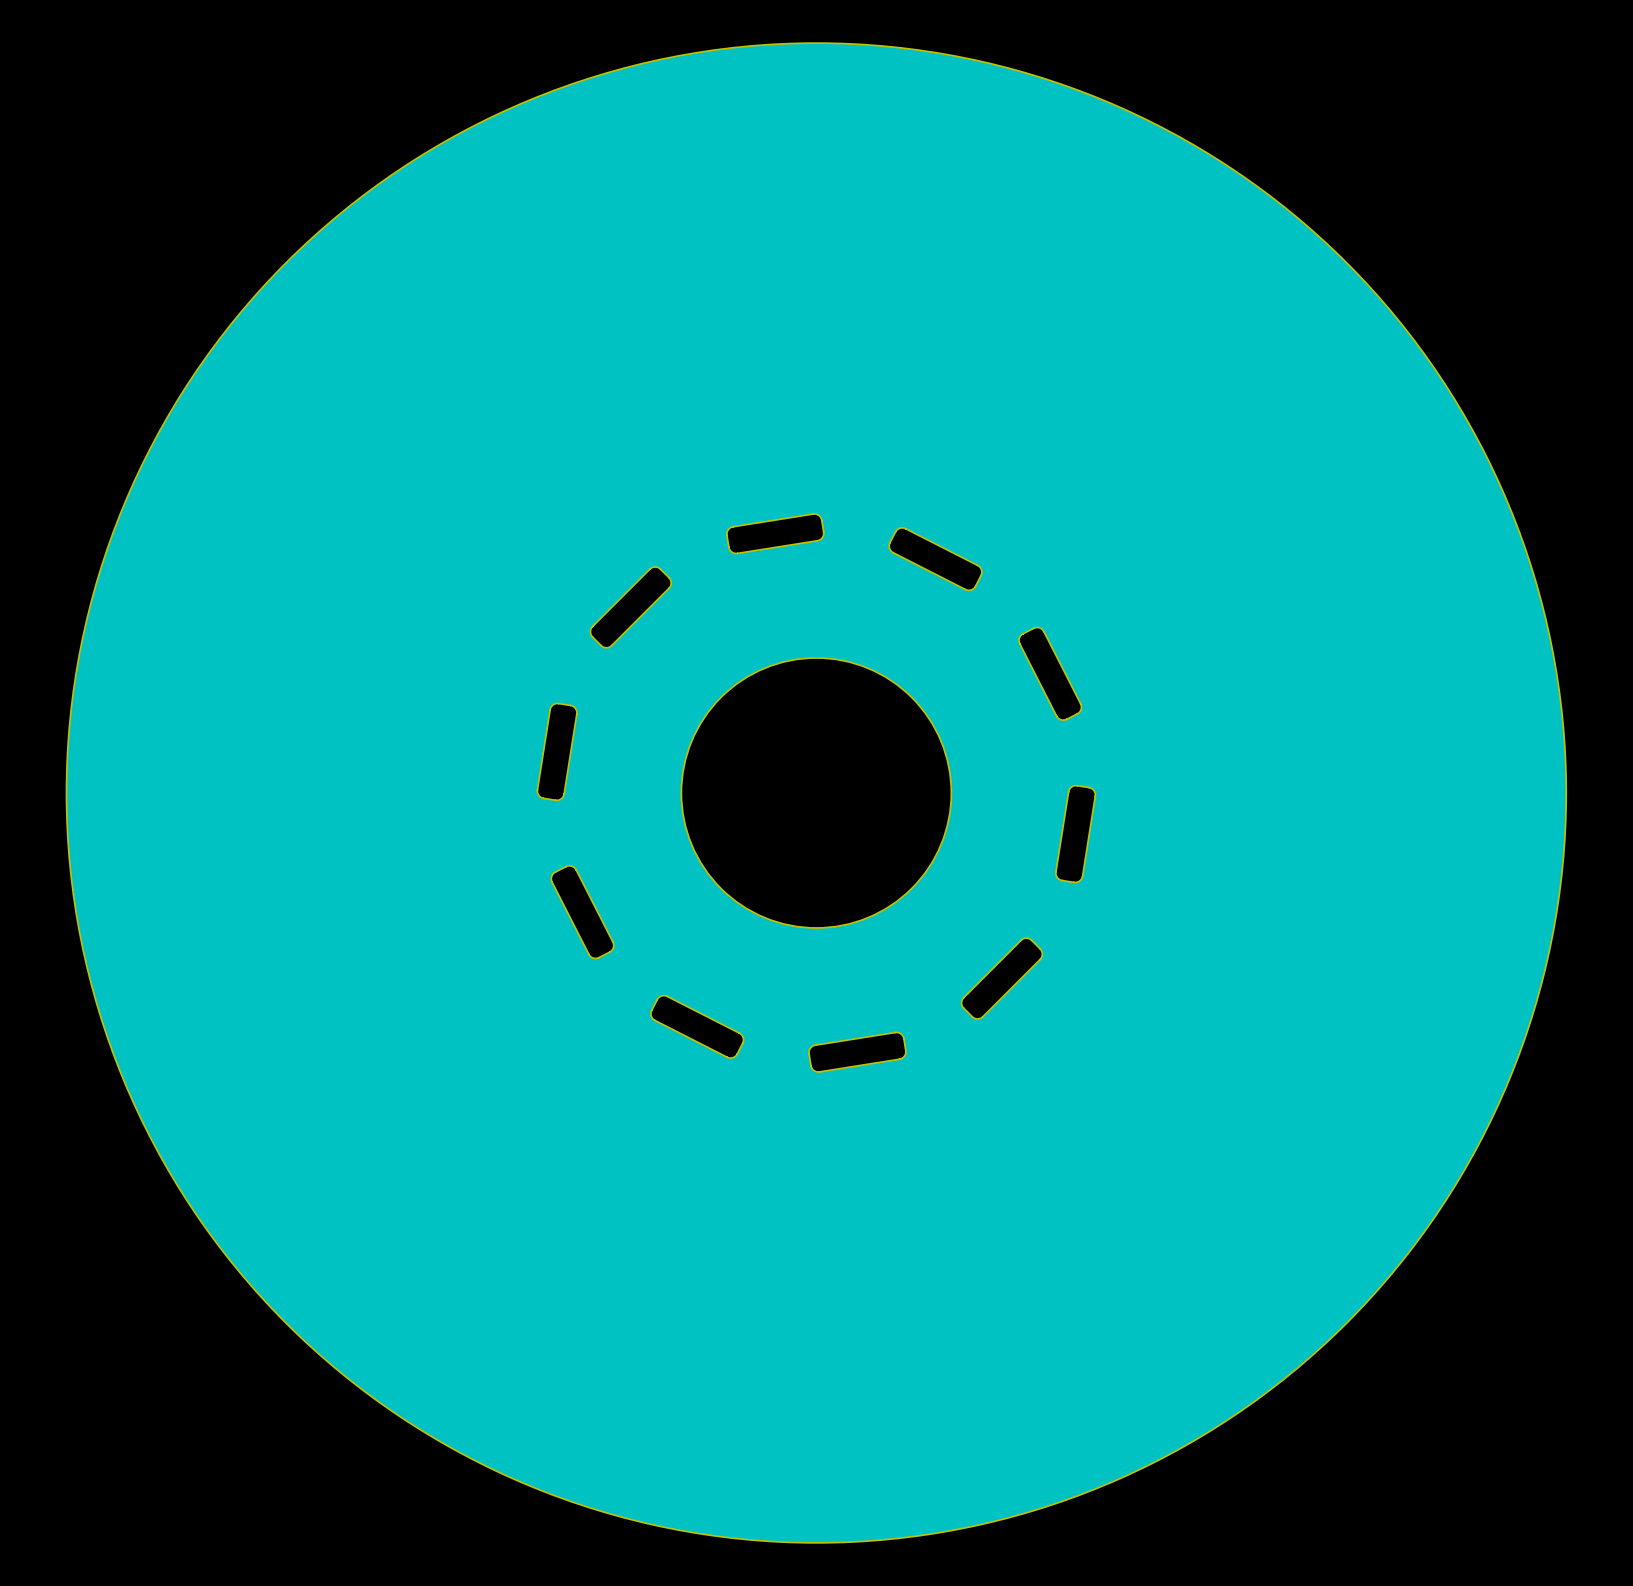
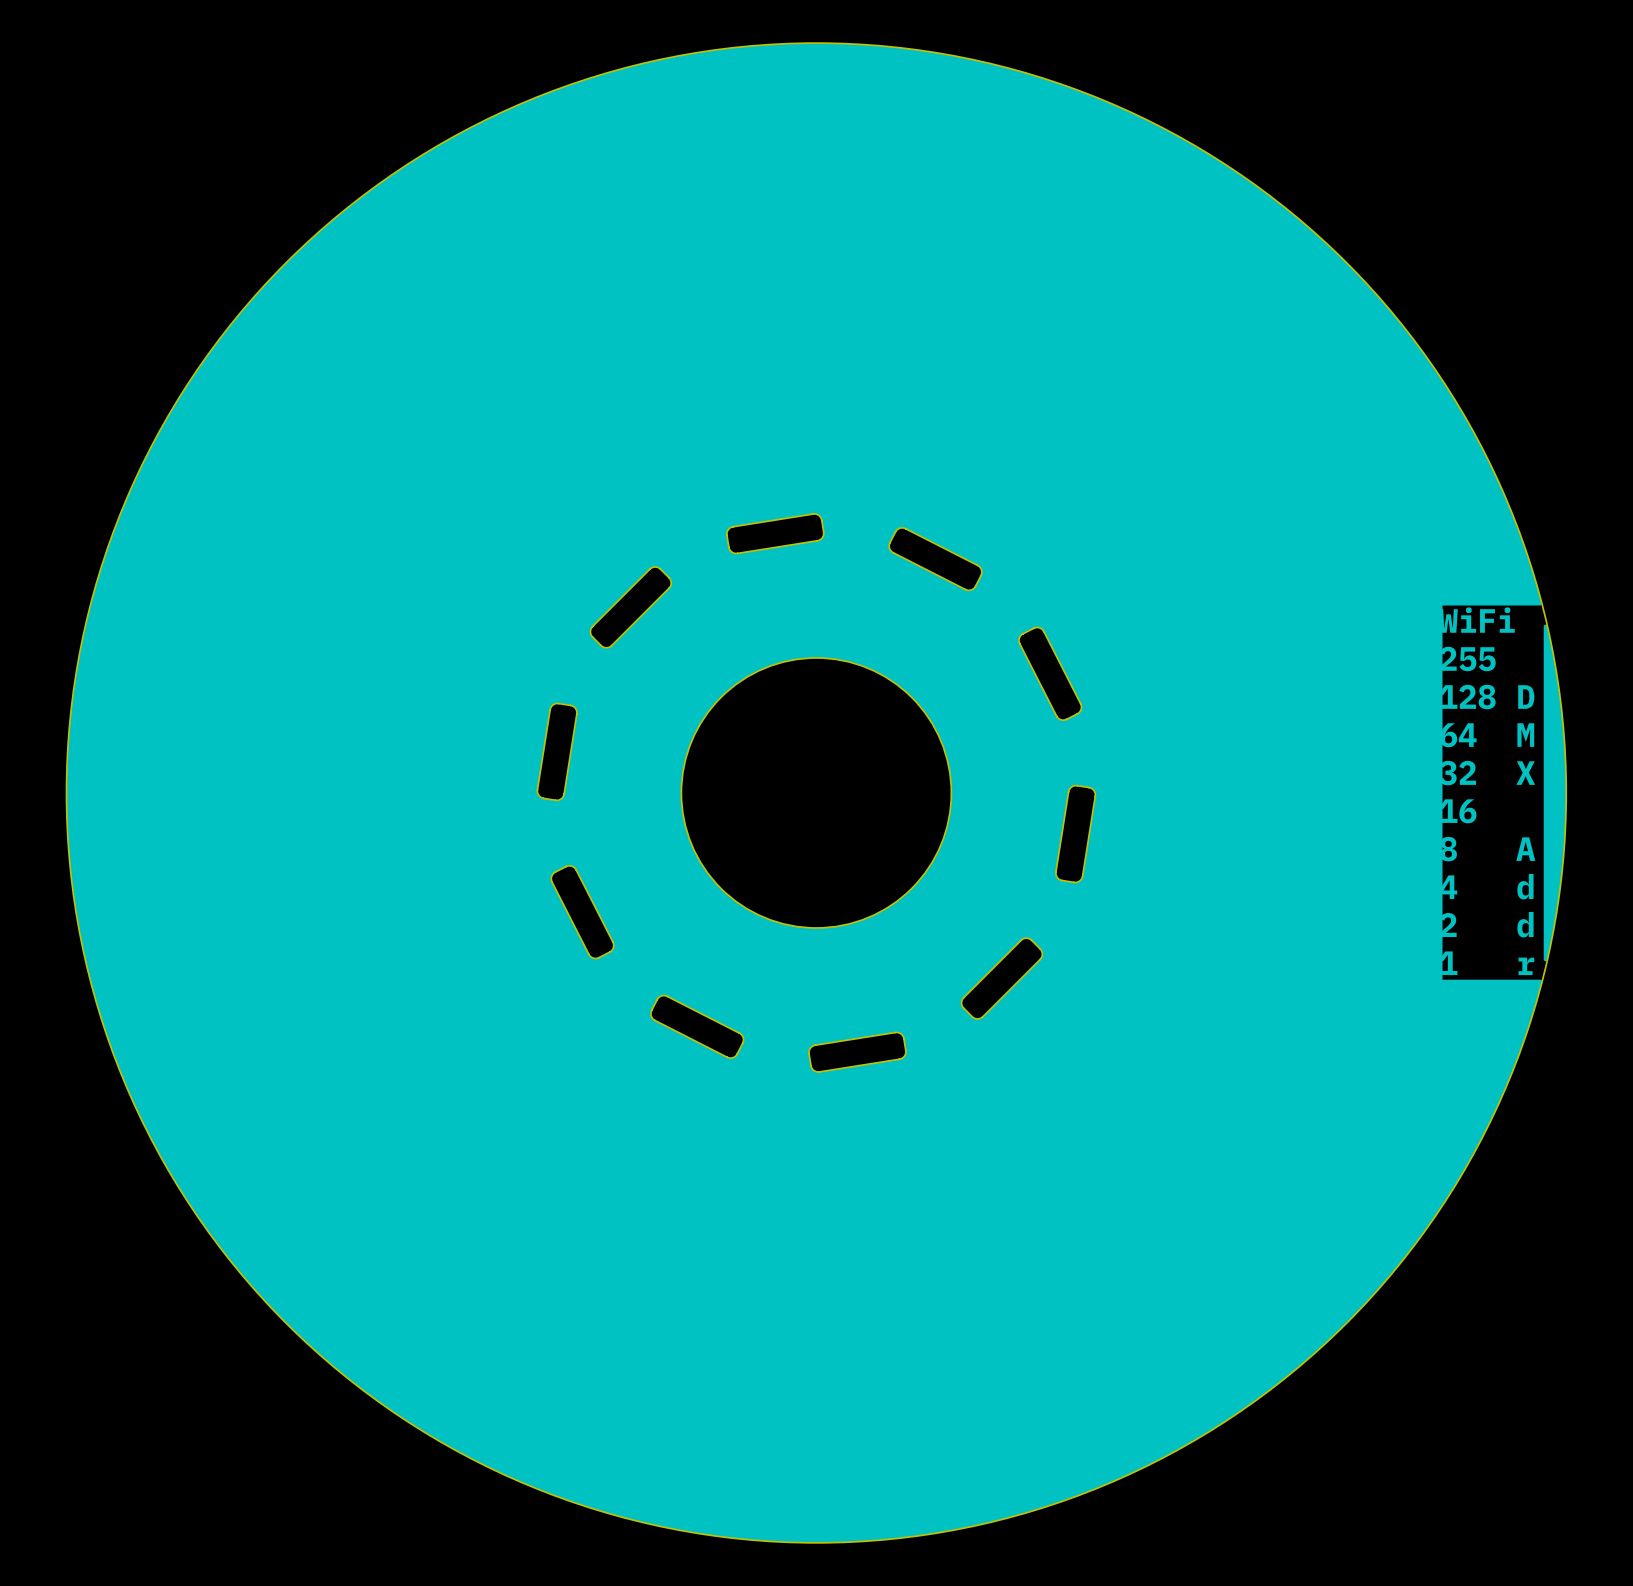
drawing shape: [66, 43, 1567, 1543] -> [66, 43, 1543, 1543]
text: none -> WiFi (1476, 620)
drawing: none -> [1543, 624, 1567, 962]
text: none -> 255 (1467, 658)
text: none -> 128 D (1487, 697)
text: none -> 64 M (1487, 735)
text: none -> 32 X (1487, 773)
text: none -> 16 (1458, 811)
text: none -> 8 A (1487, 849)
text: none -> 4 d (1486, 886)
text: none -> 2 d (1486, 924)
text: none -> 1 r (1487, 963)

